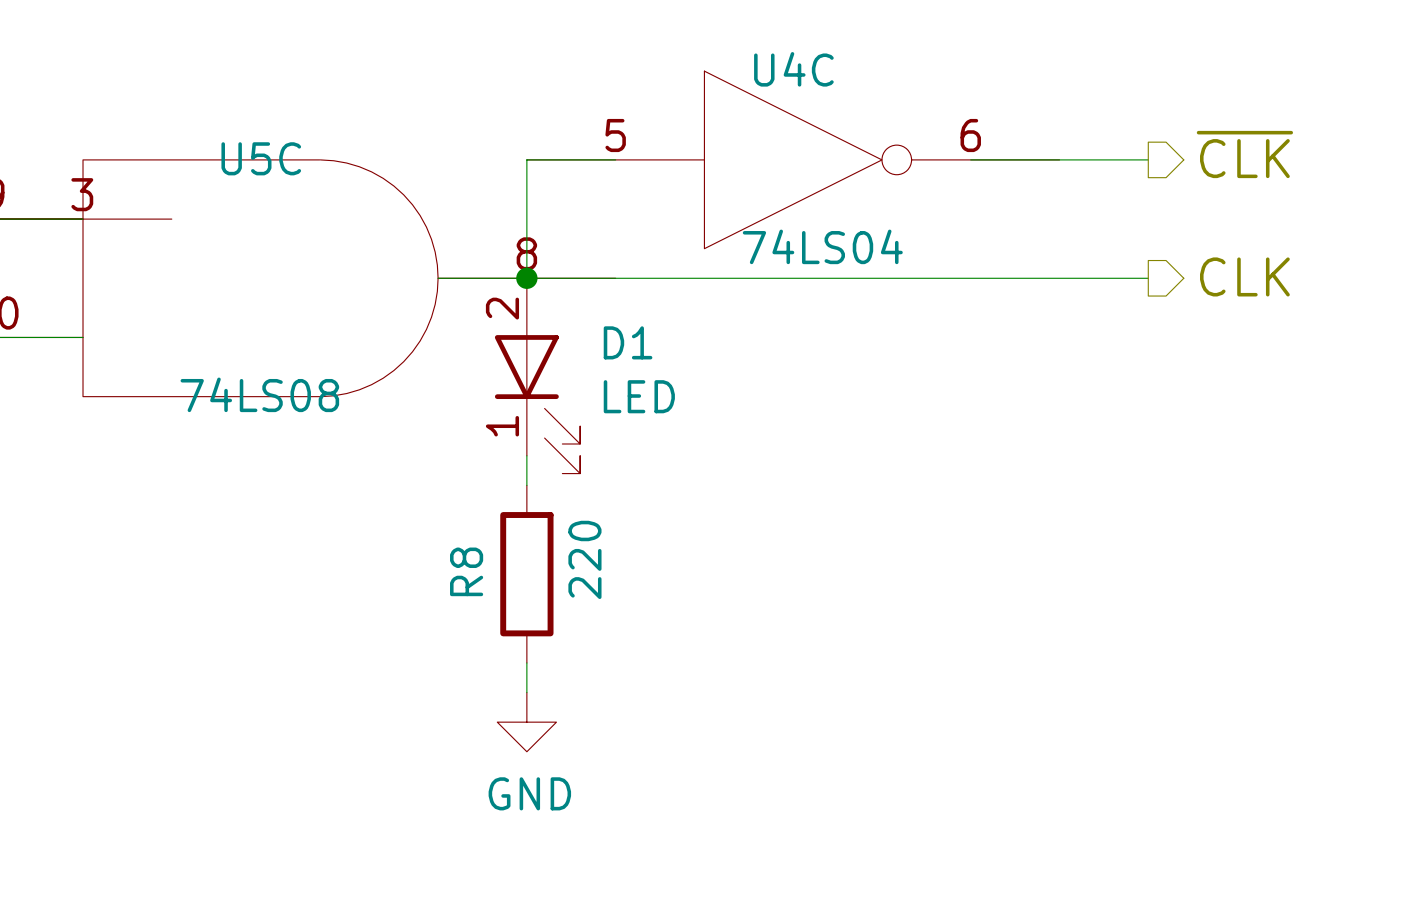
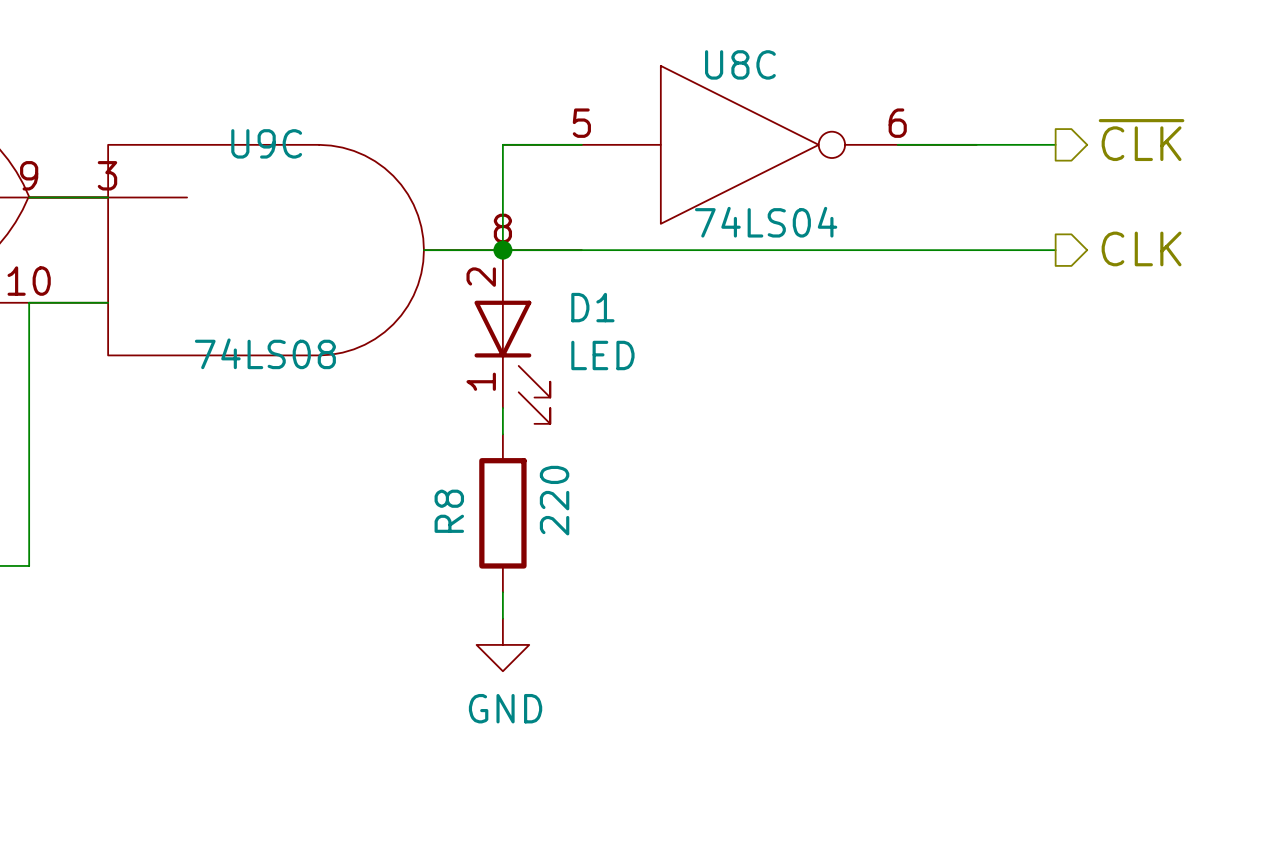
U4C name: U4C (793, 69) -> U8C (740, 64)
U5C name: U5C (261, 158) -> U9C (266, 143)

